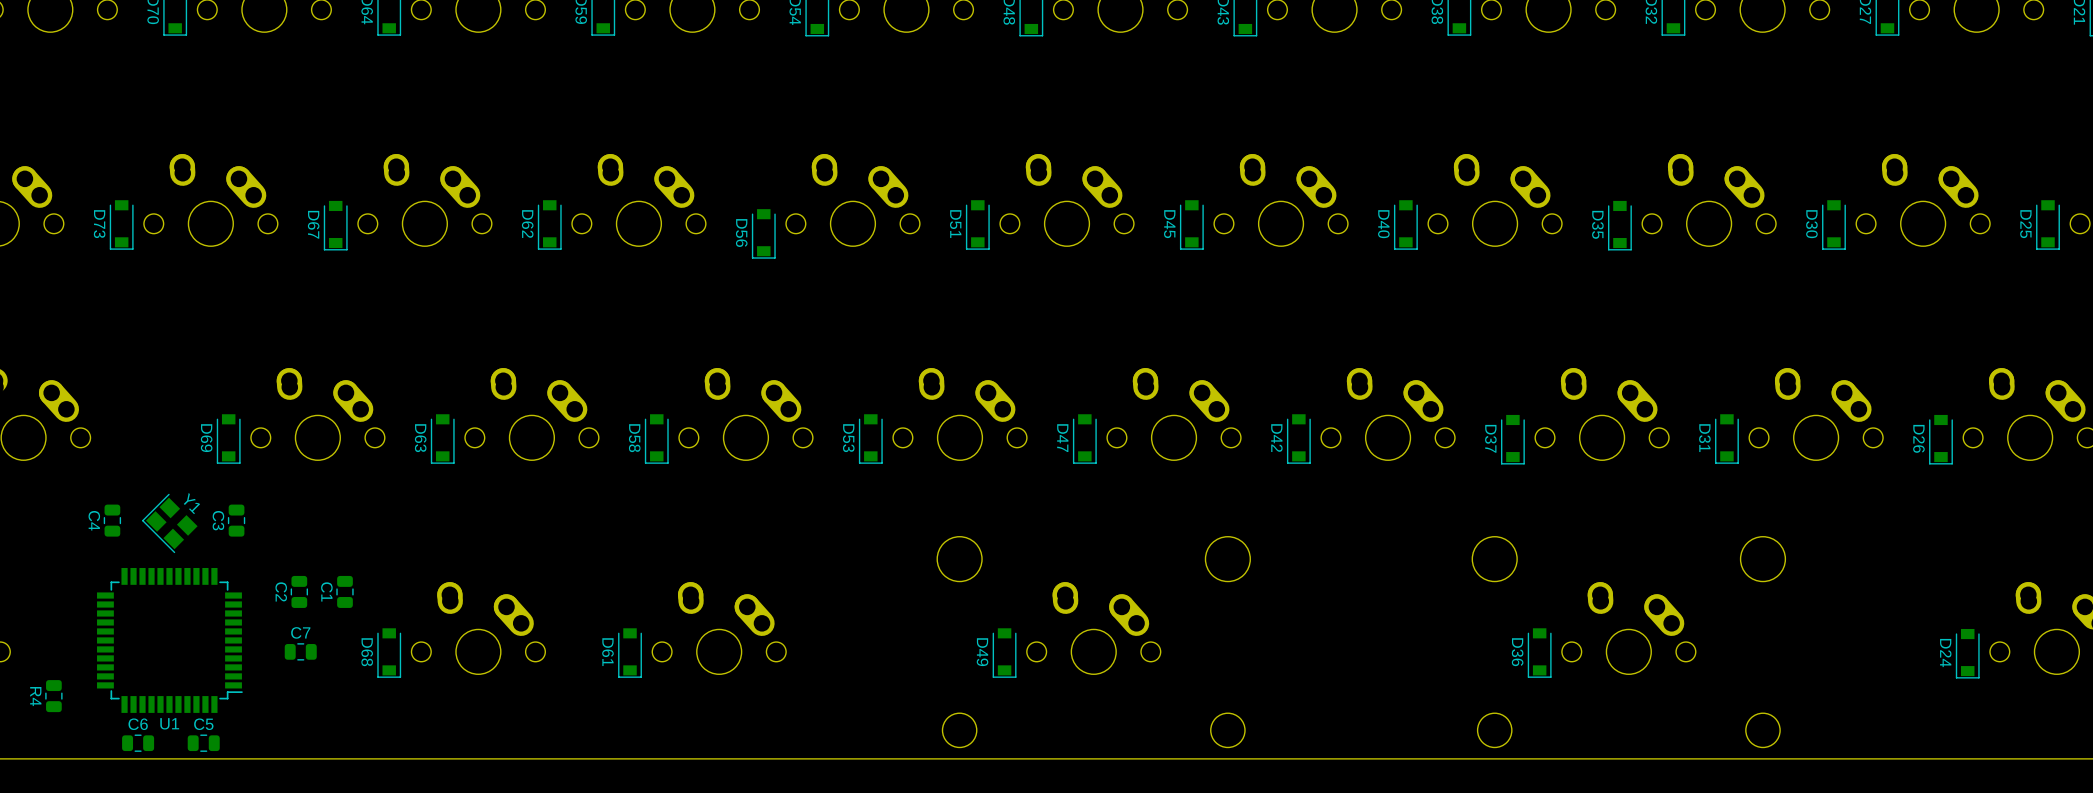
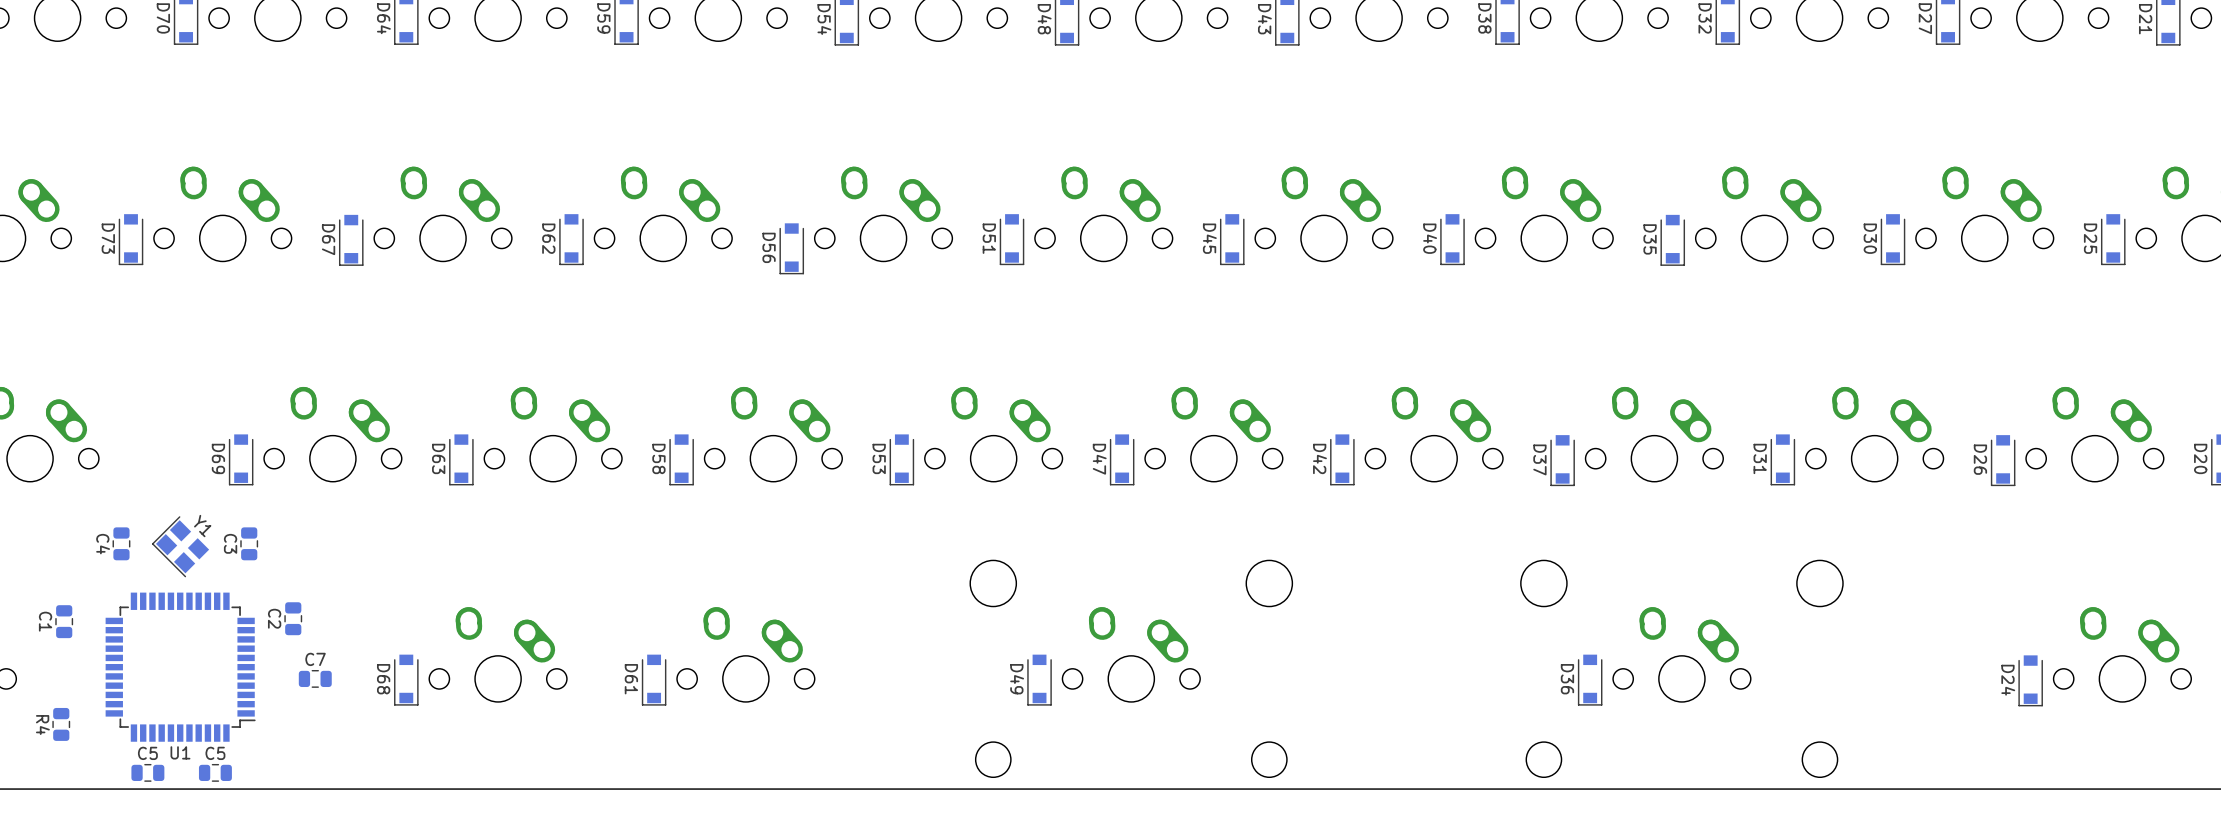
C2 position: (299, 591) -> (293, 618)
C1 position: (344, 591) -> (64, 621)
C6 name: C6 (138, 724) -> C5 (147, 753)

